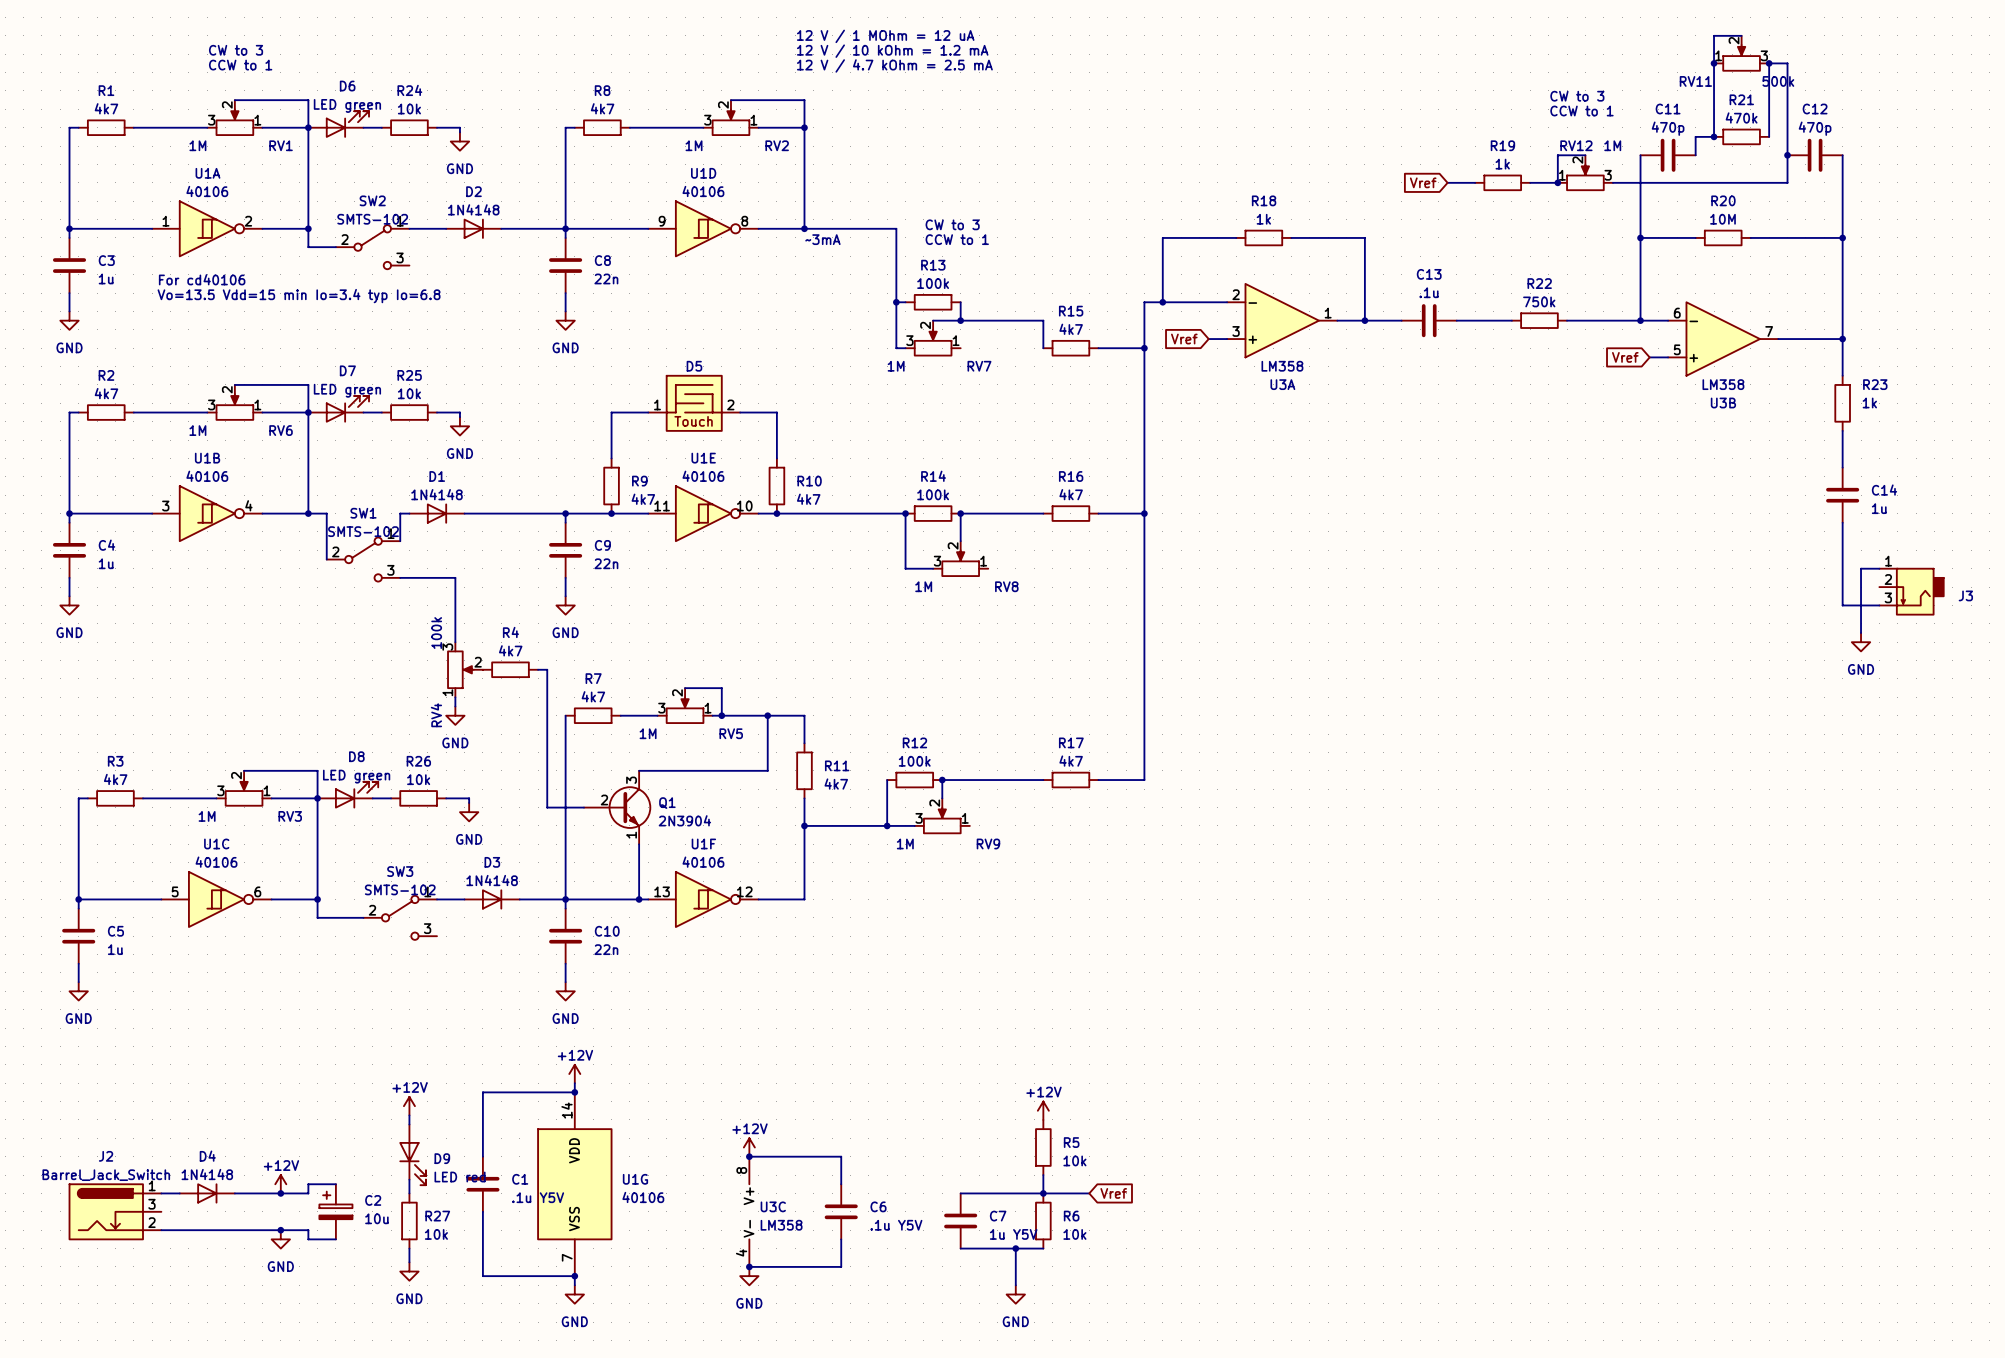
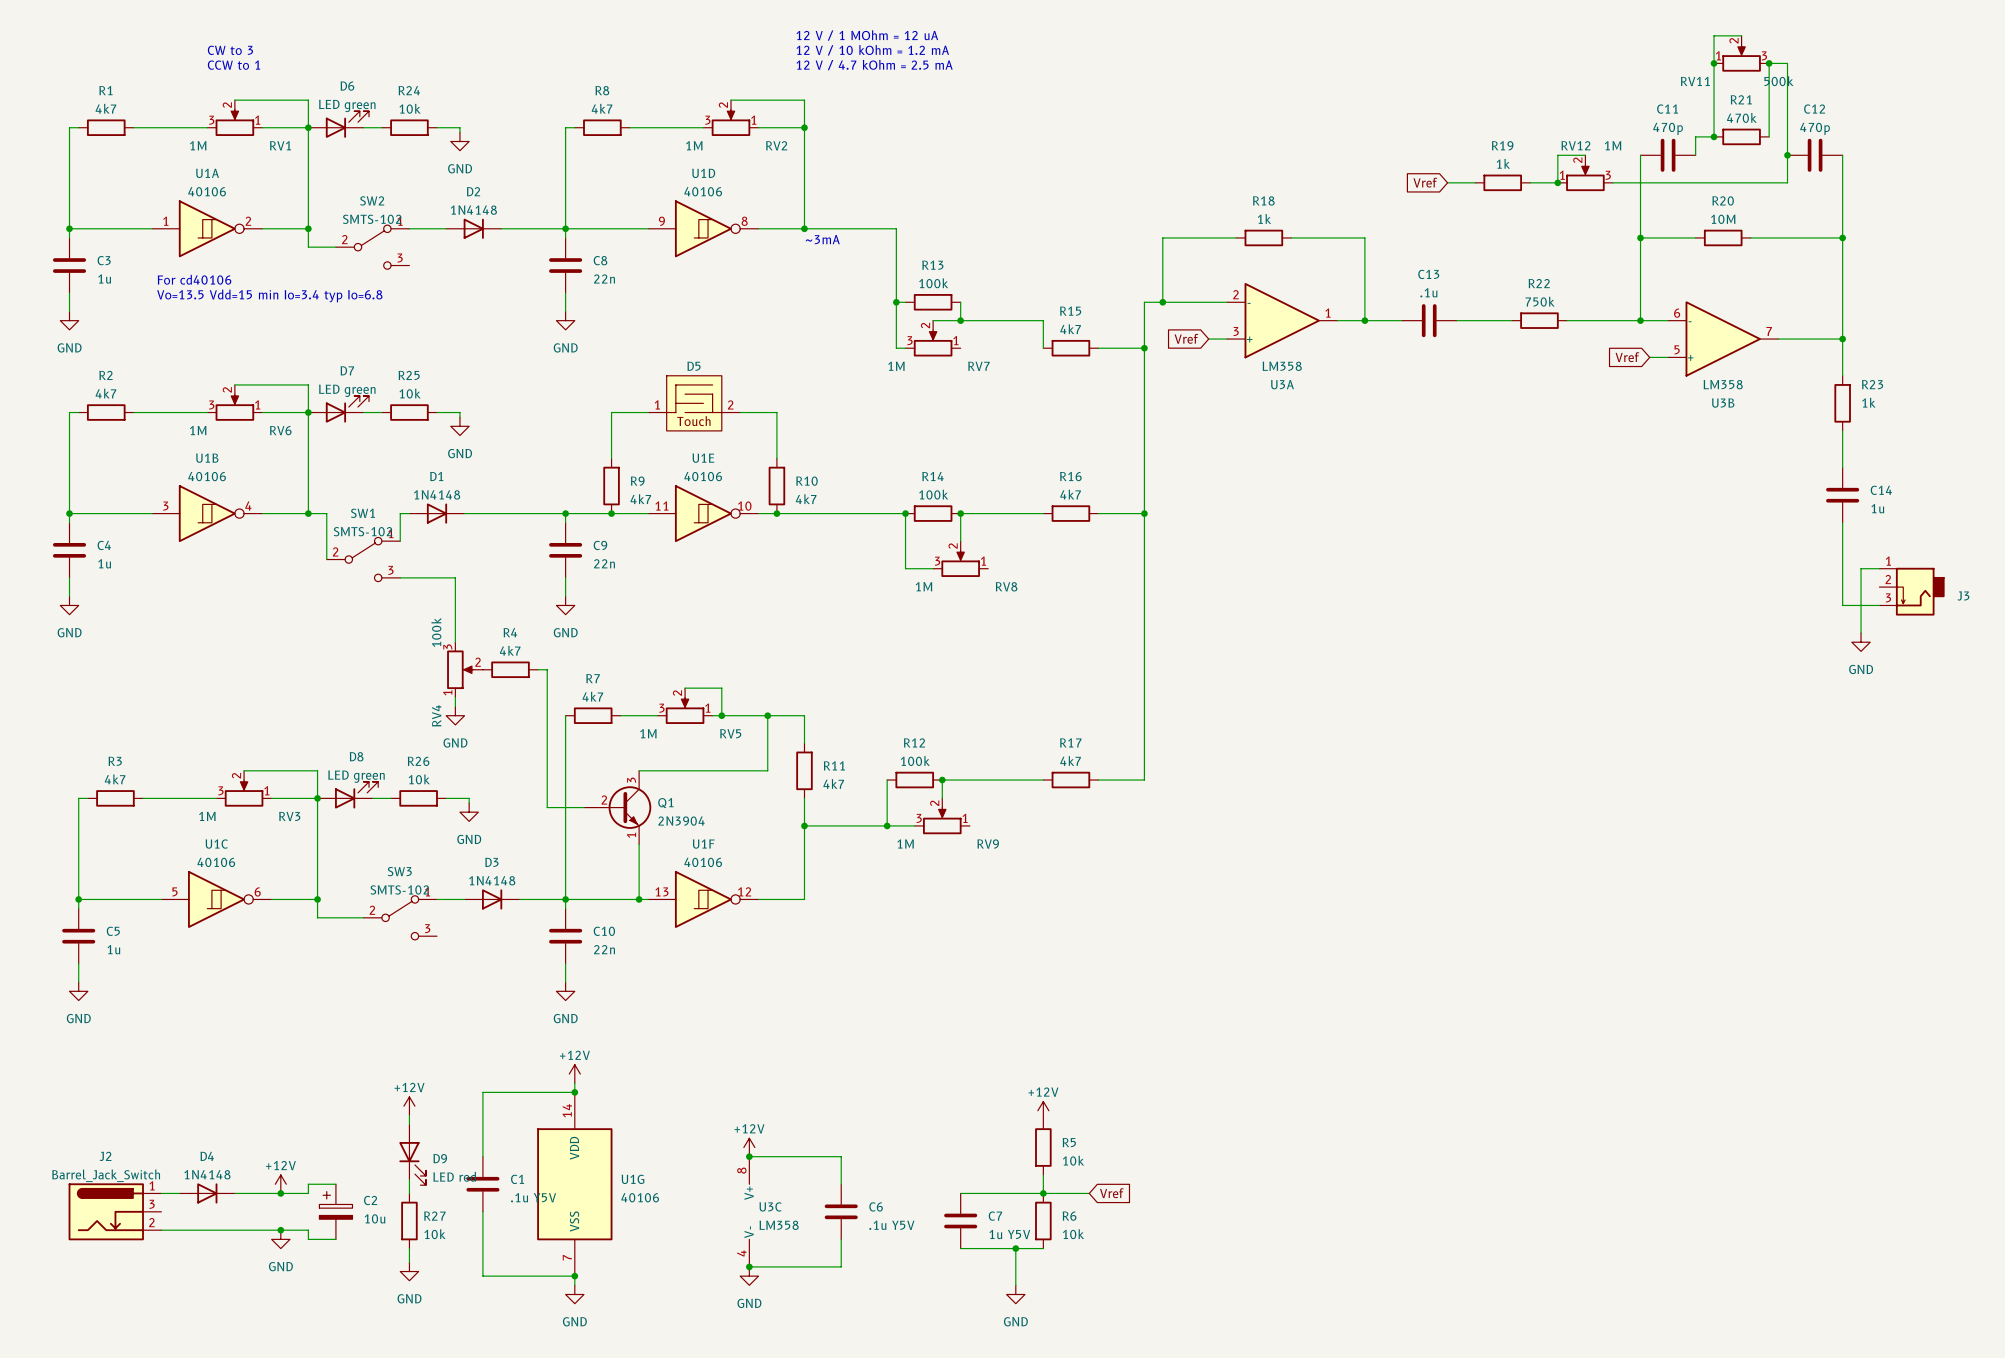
text: CW to 3 (1577, 96) -> none
text: CCW to 1 (1581, 111) -> none
text: CW to 3 (952, 224) -> none
text: CCW to 1 (957, 239) -> none

